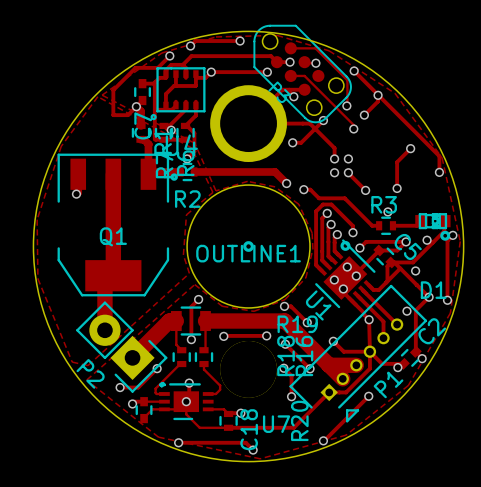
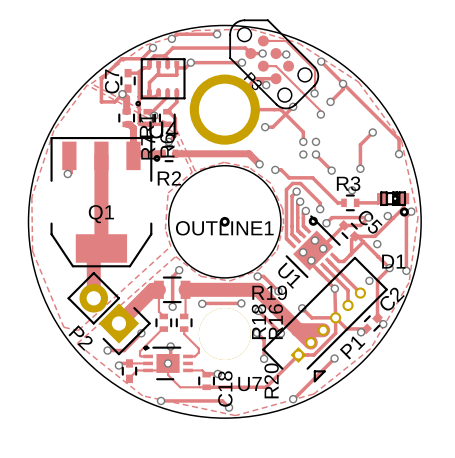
C7 name position: C7 (143, 125) -> C7 (112, 81)

